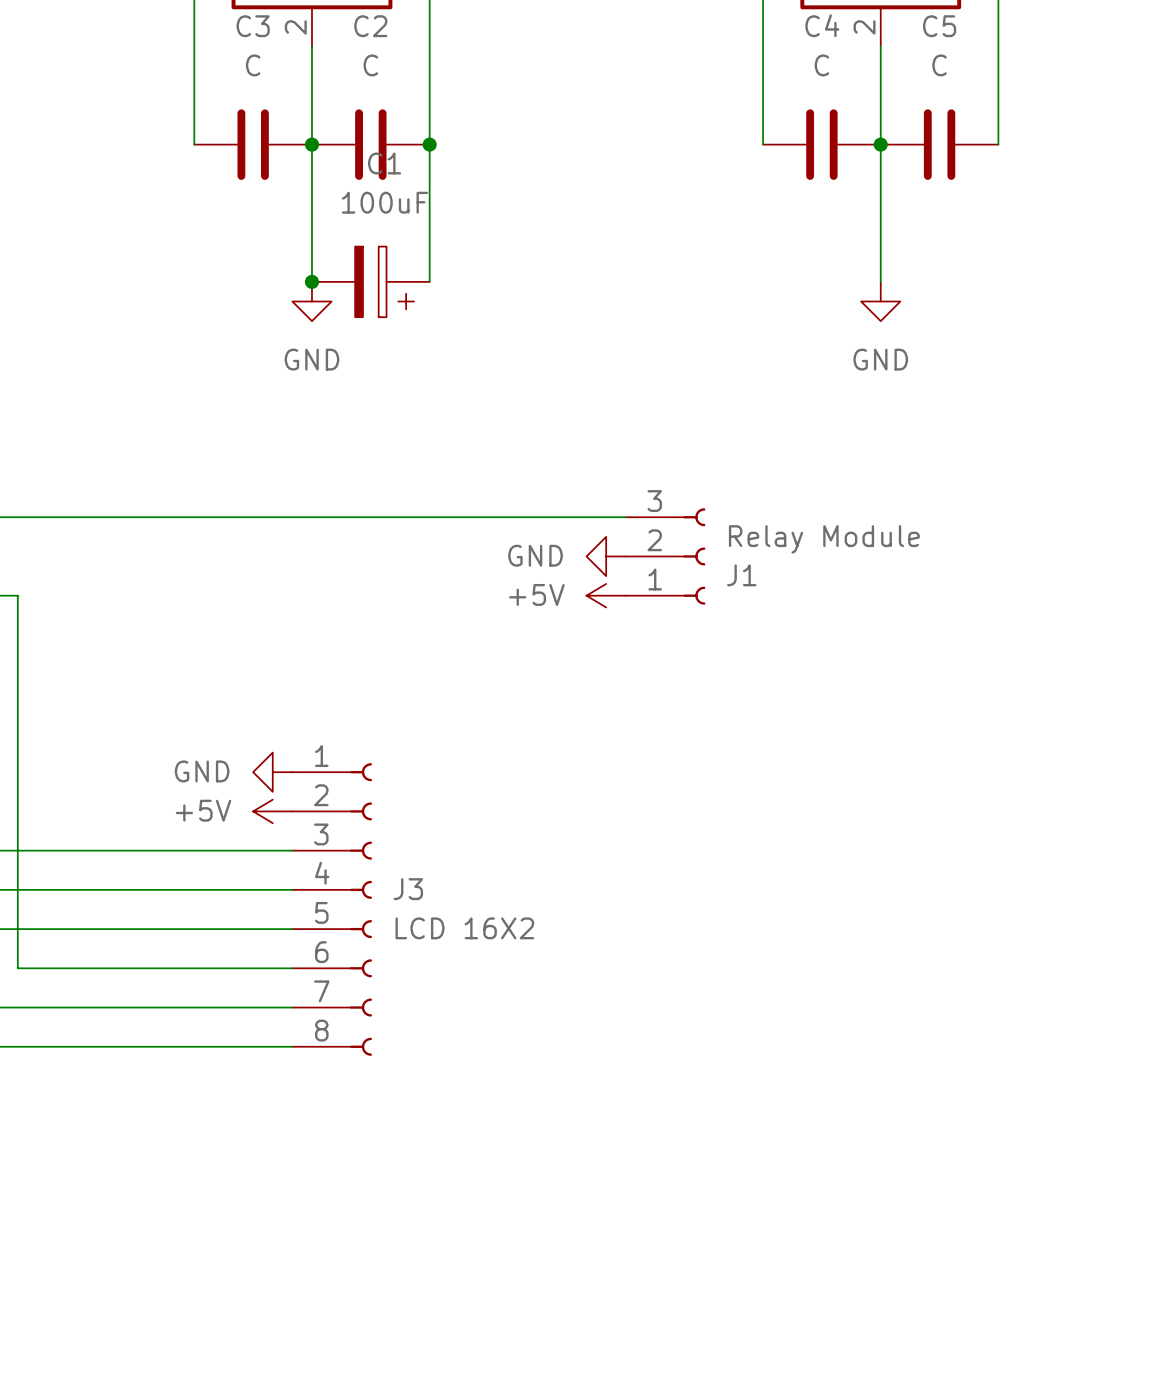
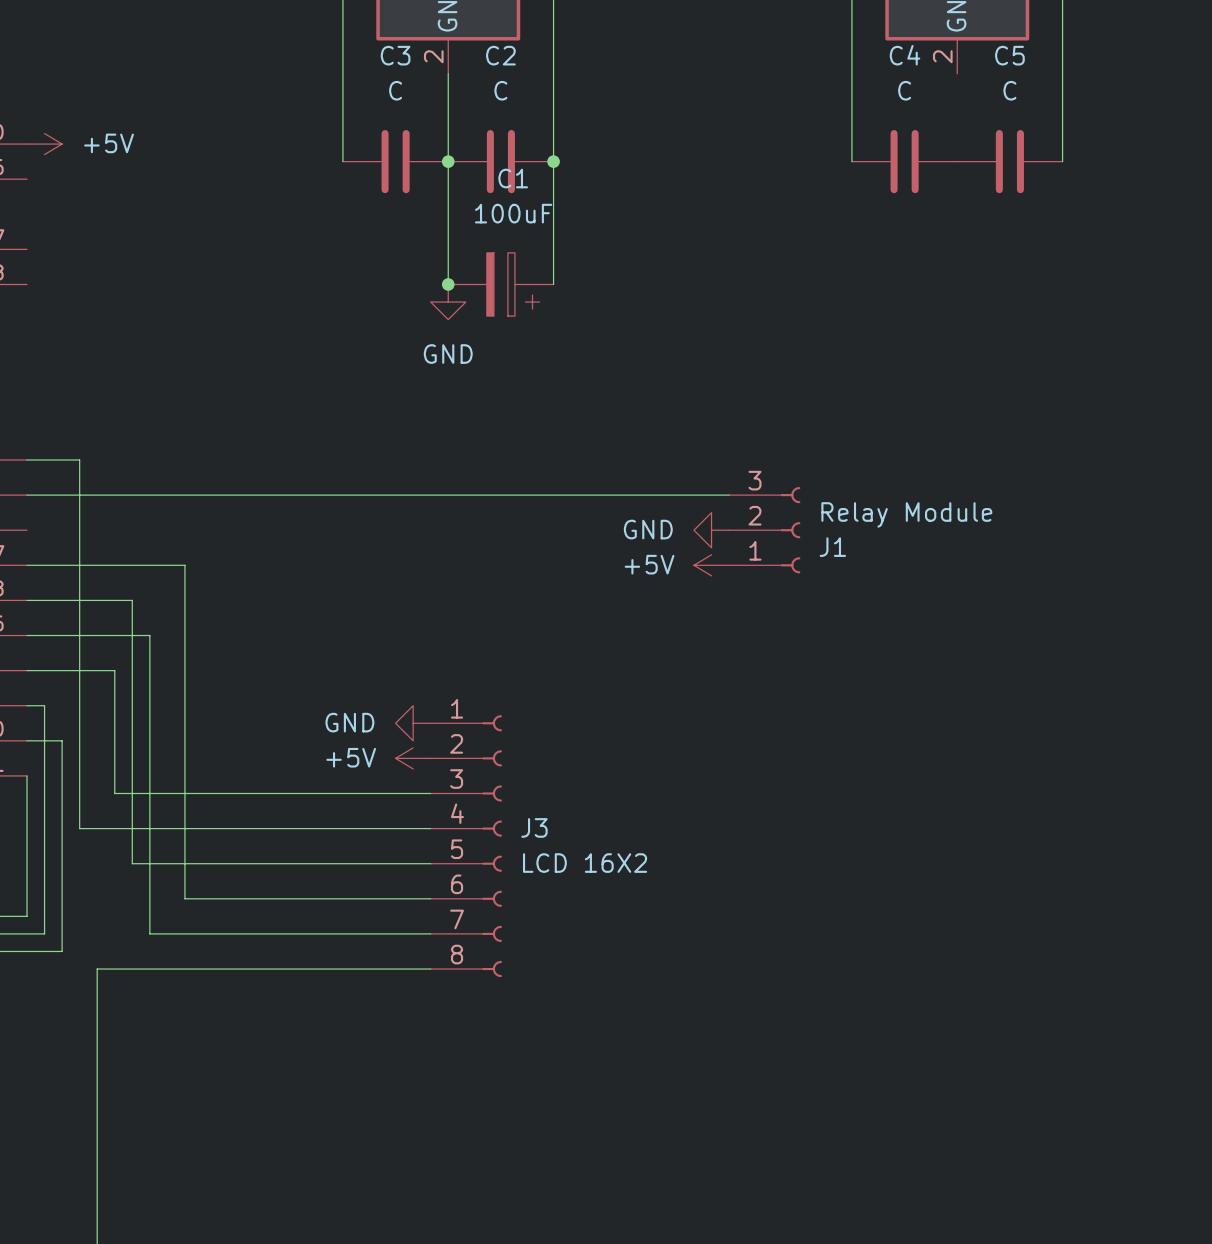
wire: (880, 46) (880, 281) -> none
junction: (880, 144) -> none
power symbol: GND (880, 301) -> none

